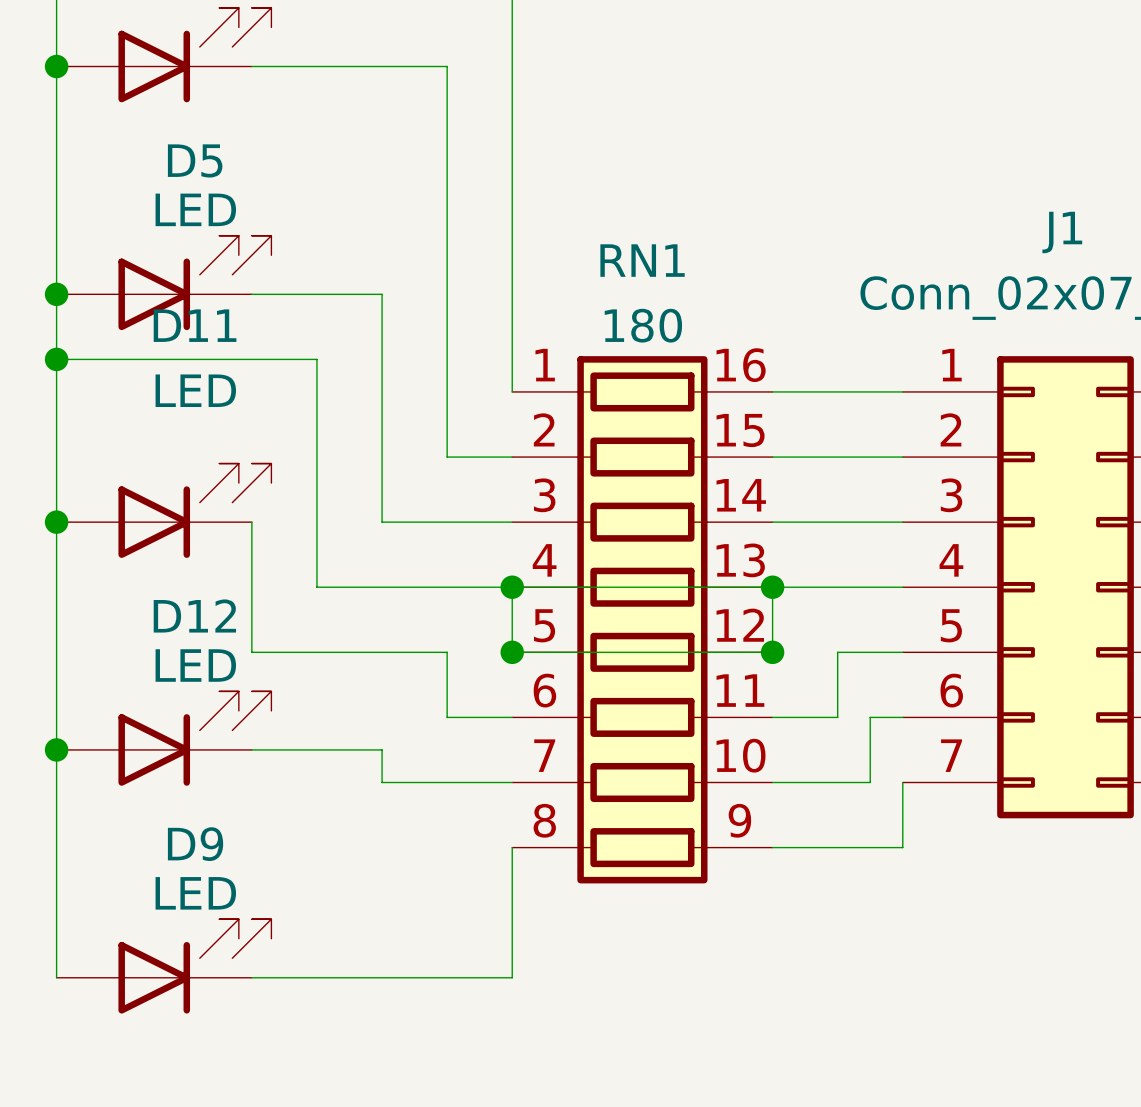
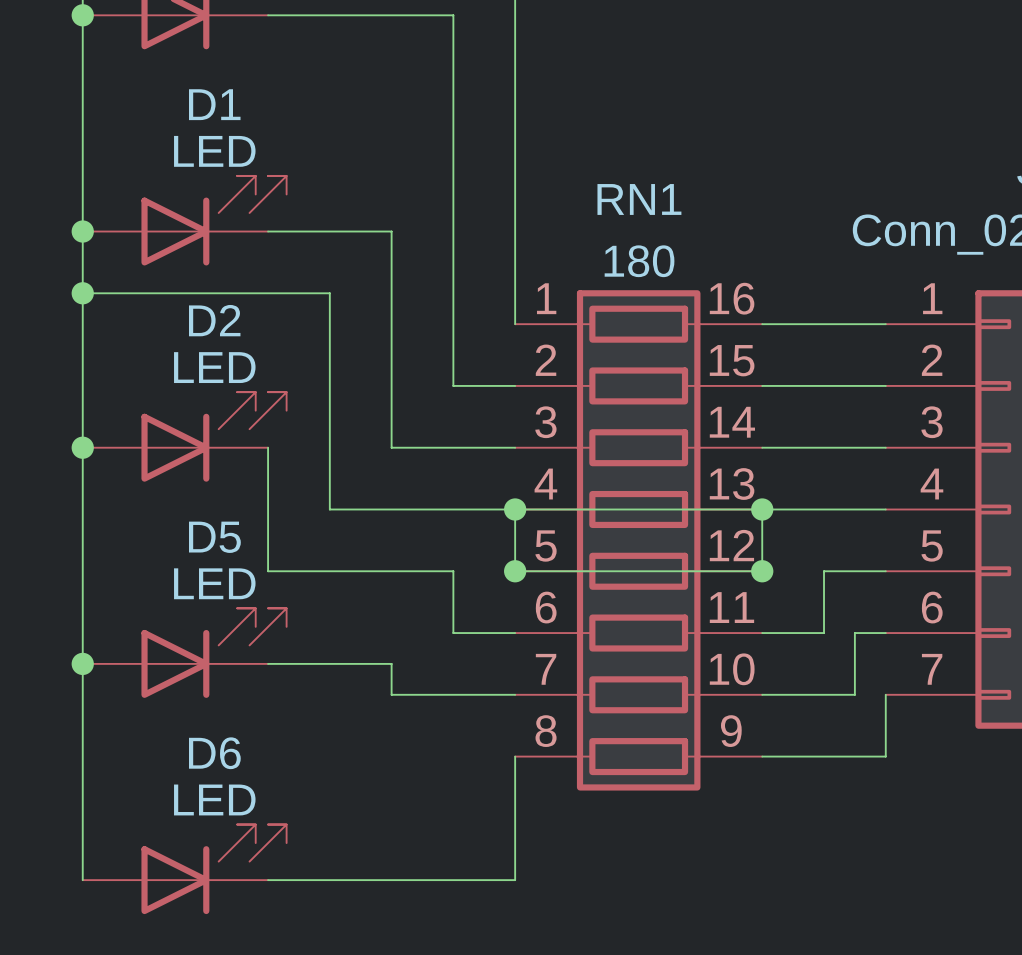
D5 name: D5 (195, 160) -> D1 (214, 104)
D11 name: D11 (195, 325) -> D2 (214, 320)
D11 value position: LED (195, 390) -> LED (214, 367)
D12 name: D12 (194, 615) -> D5 (214, 537)
D9 name: D9 (195, 844) -> D6 (214, 753)

